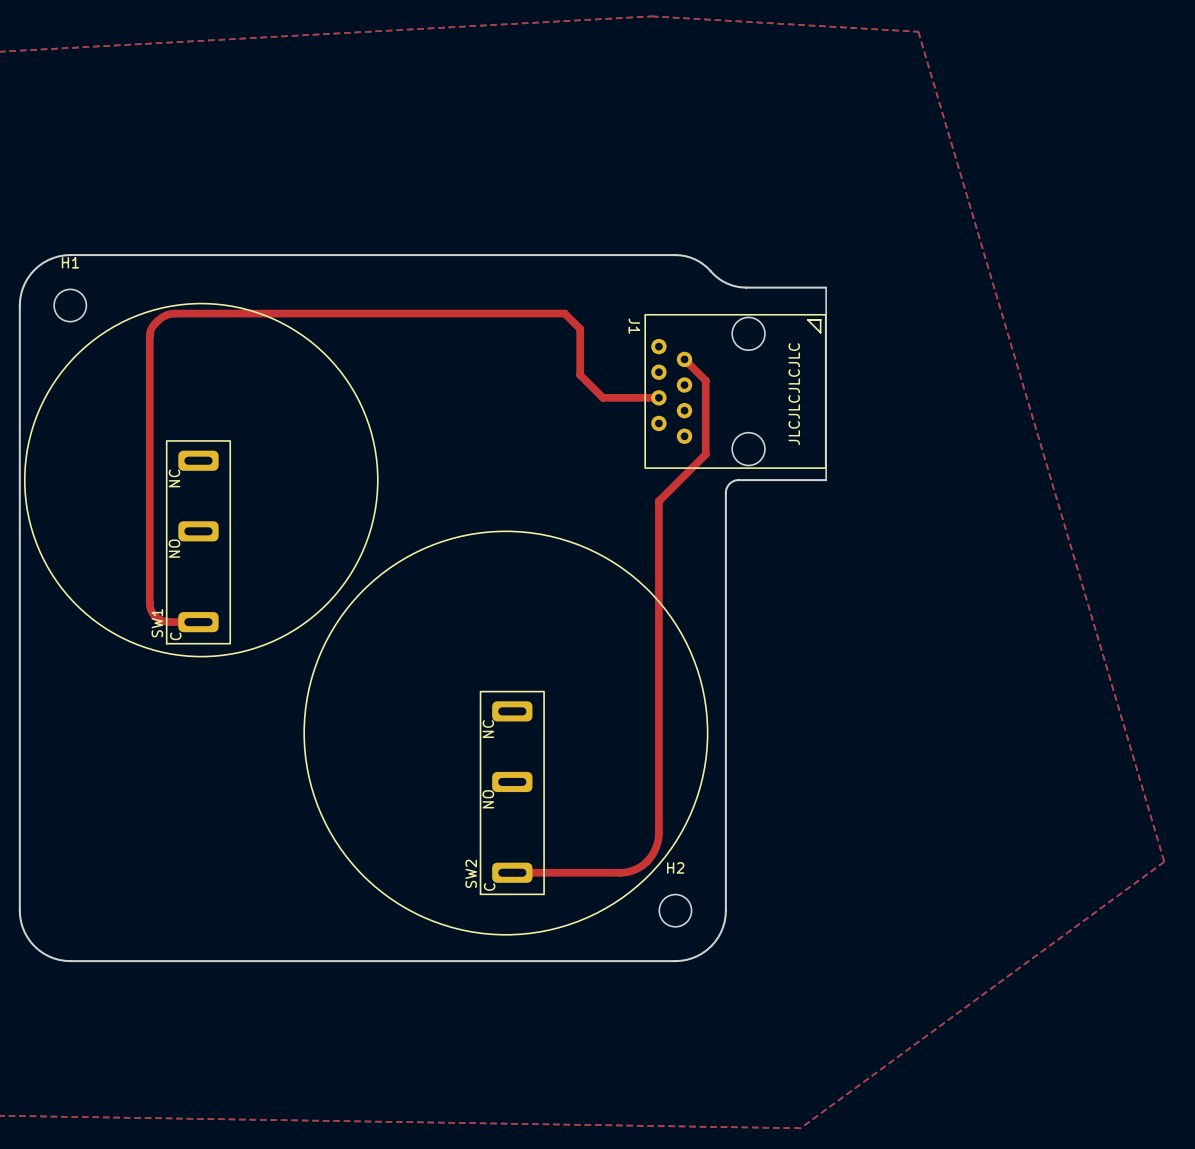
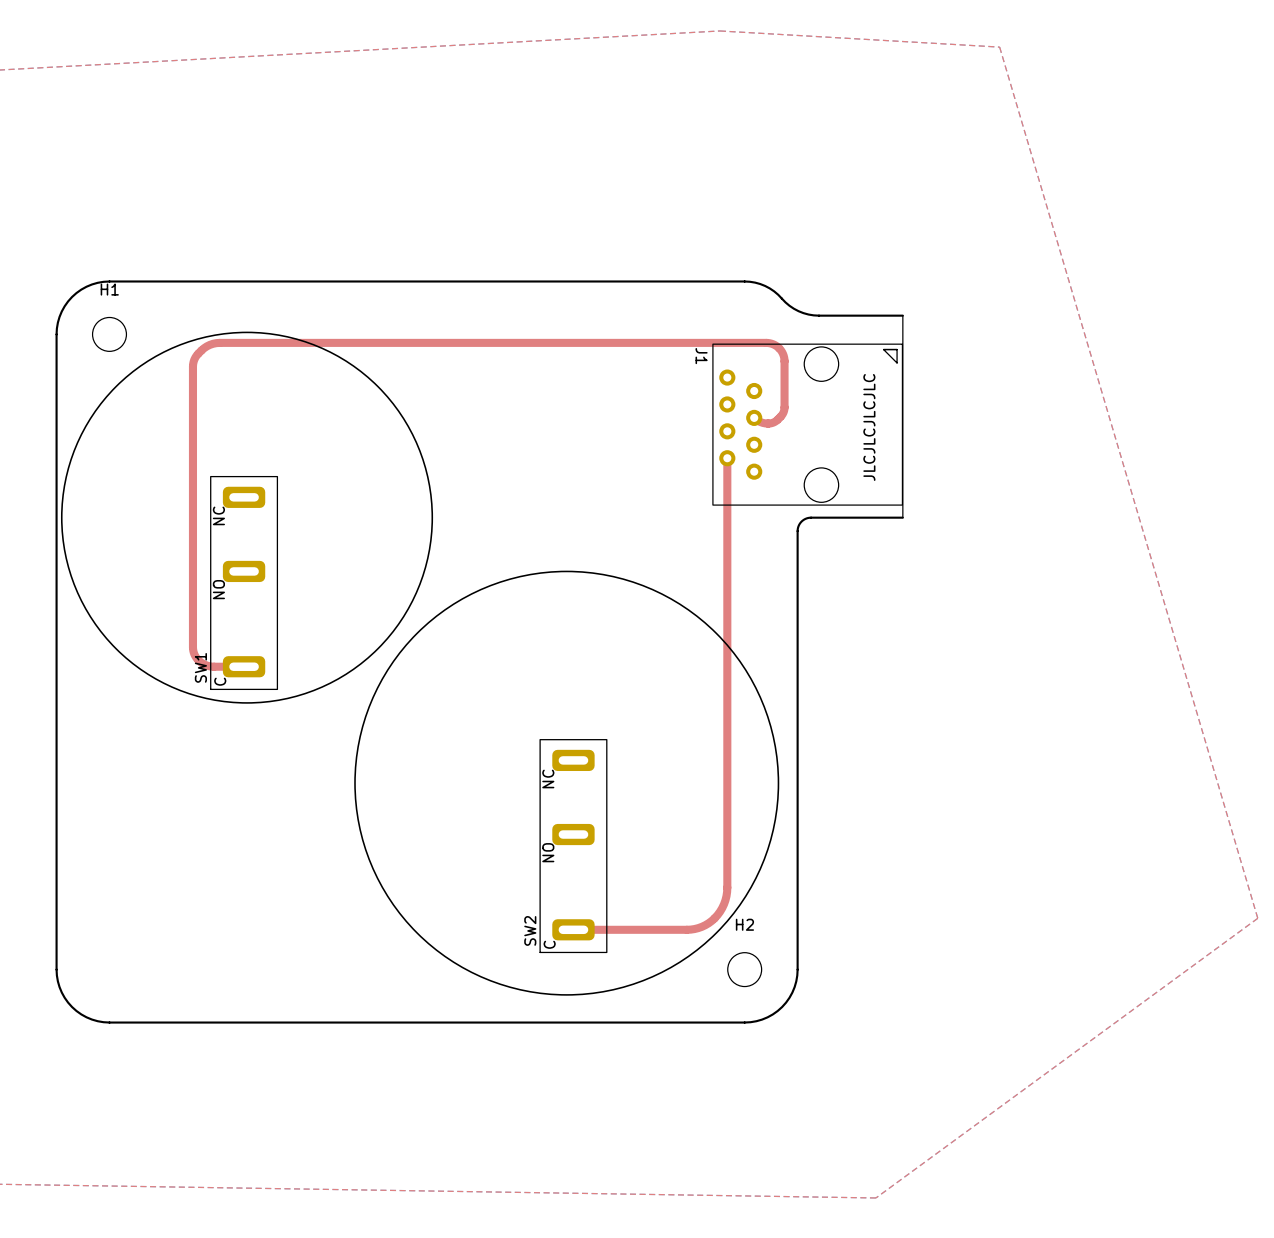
top track: (564, 313) (580, 328) (580, 375) (602, 397) (658, 397) -> (628, 342) (766, 342) (774, 345) (781, 351) (784, 359) (784, 410) (777, 419) (770, 423) (762, 422) (754, 417)
top track: (684, 359) (705, 380) (705, 454) (658, 501) -> (727, 458) (727, 539)

